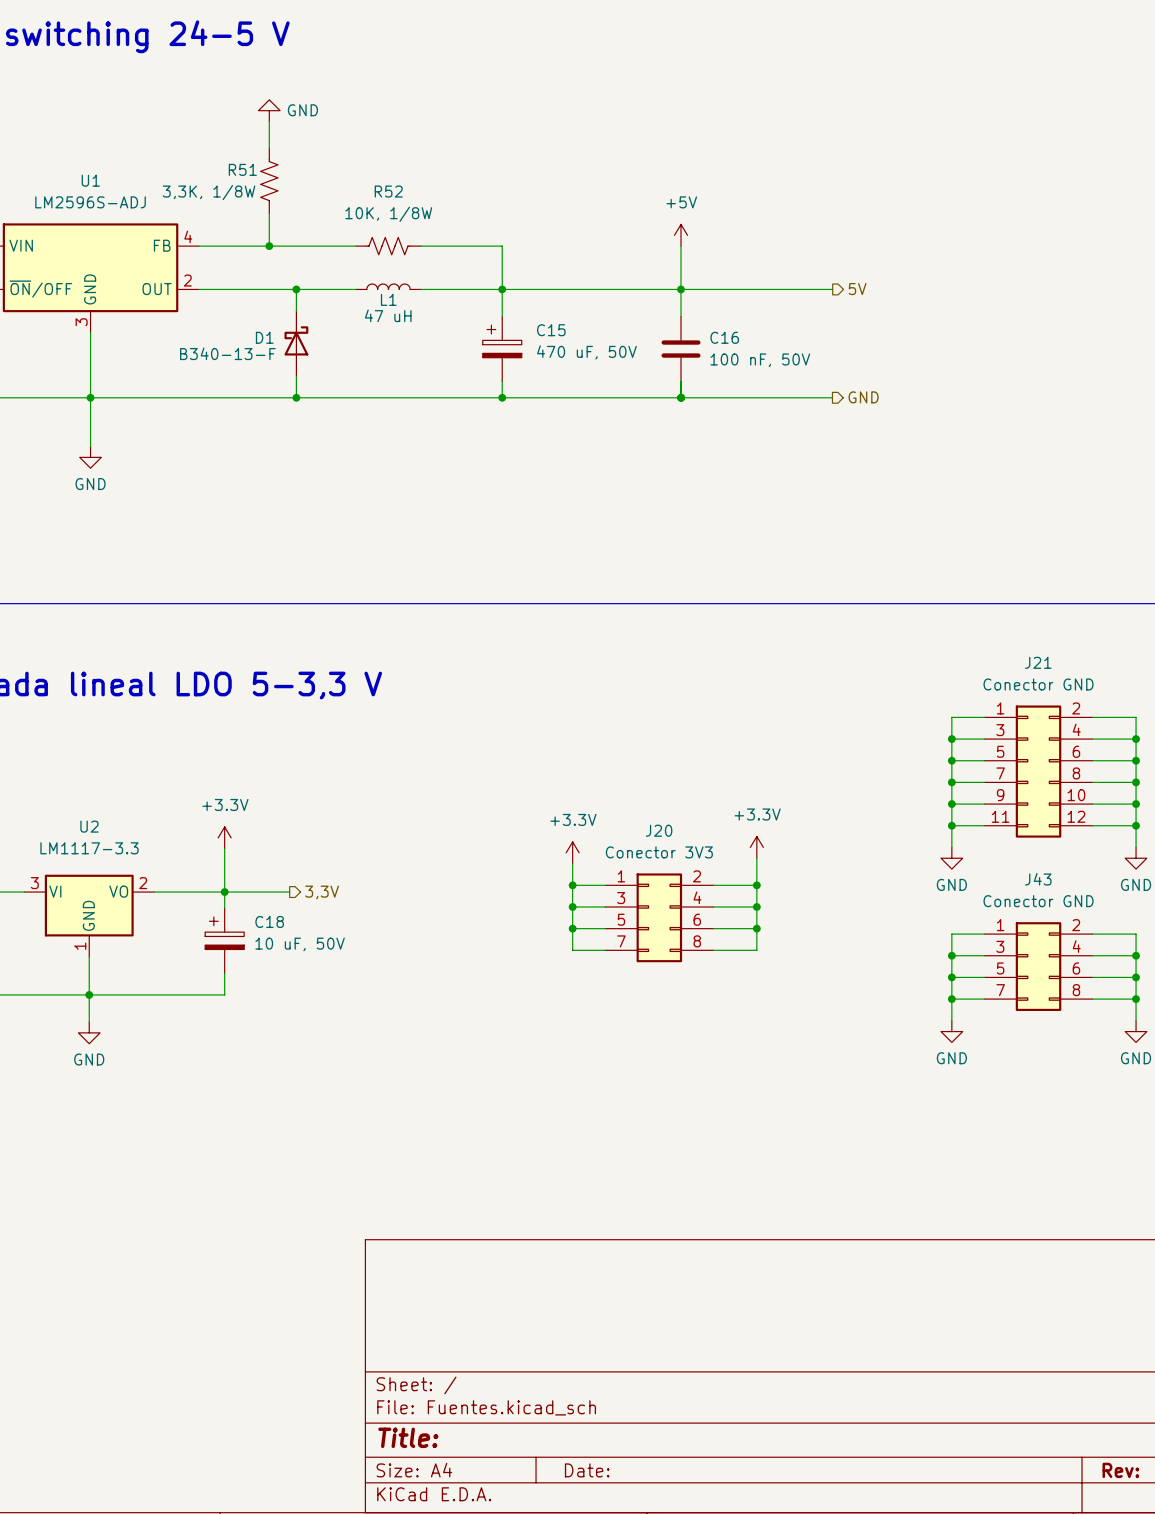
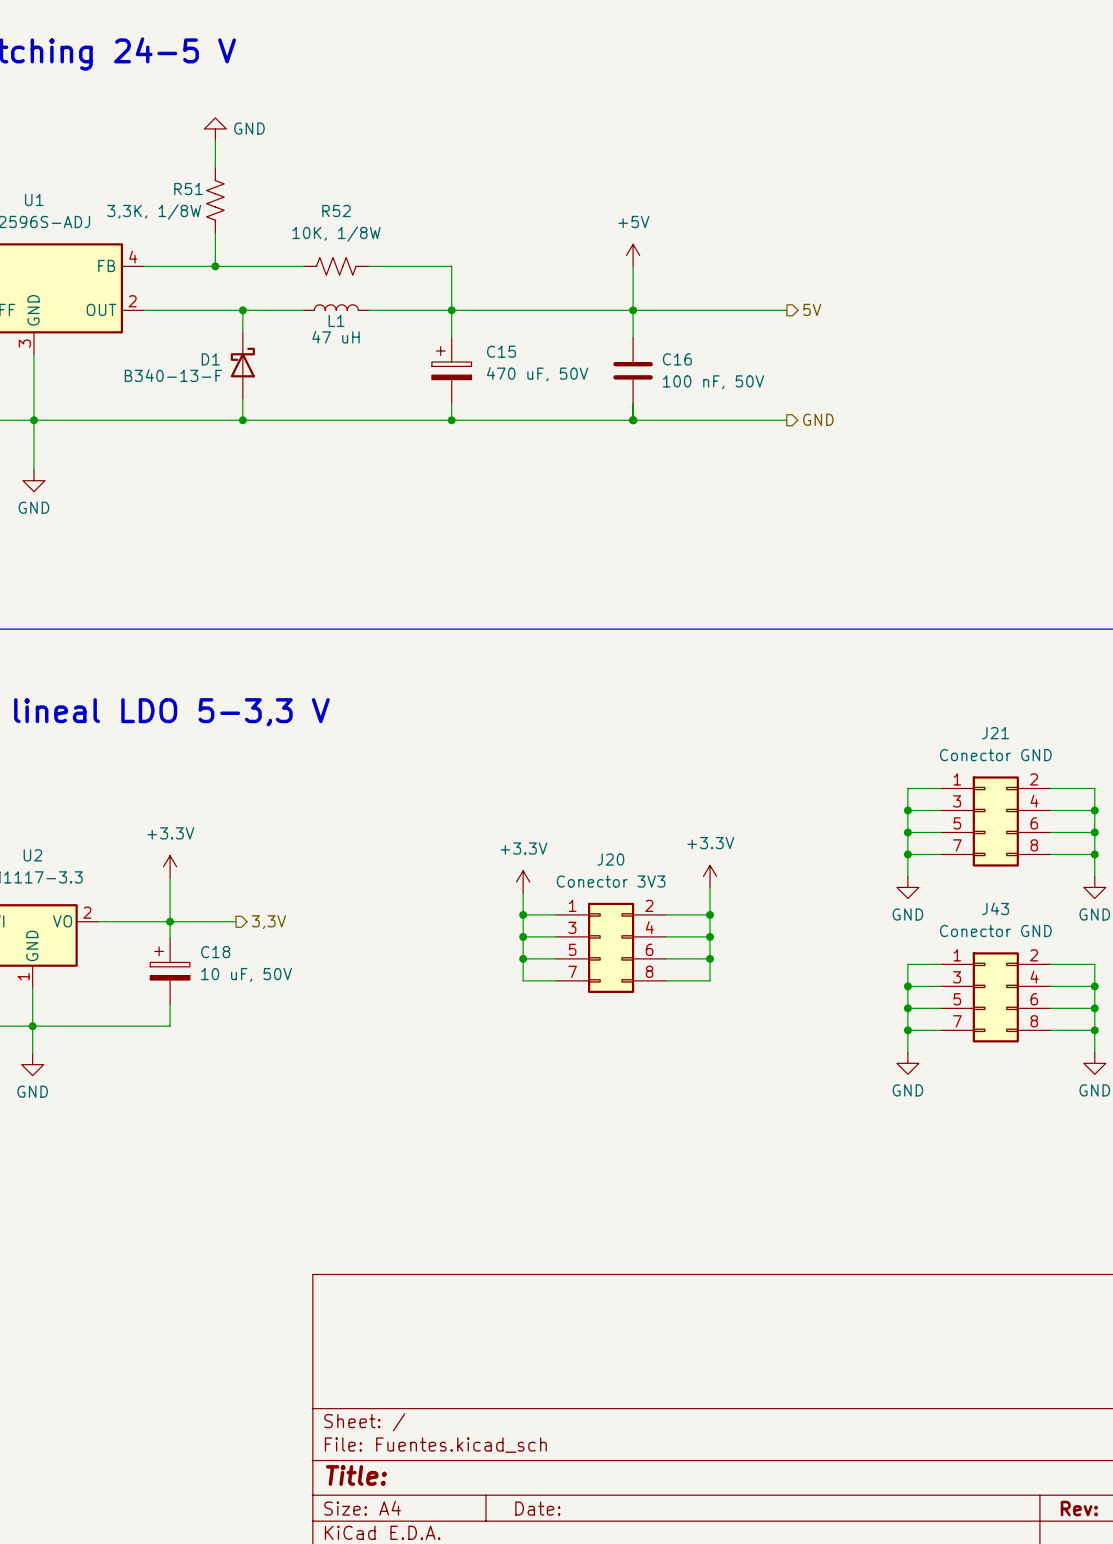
J21 name position: J21 (1038, 662) -> J21 (995, 733)
J21 value position: Conector GND (1038, 684) -> Conector GND (995, 755)
J21 symbol: [984, 705, 1093, 838] -> [940, 776, 1051, 867]
wire: (984, 717) (951, 717) (951, 760) -> none
wire: (1092, 717) (1136, 717) (1136, 760) -> none
wire: (951, 739) (984, 739) -> none
junction: (951, 739) -> none
wire: (1092, 739) (1136, 739) -> none
junction: (1136, 739) -> none
junction: (951, 760) -> none
junction: (1136, 760) -> none

